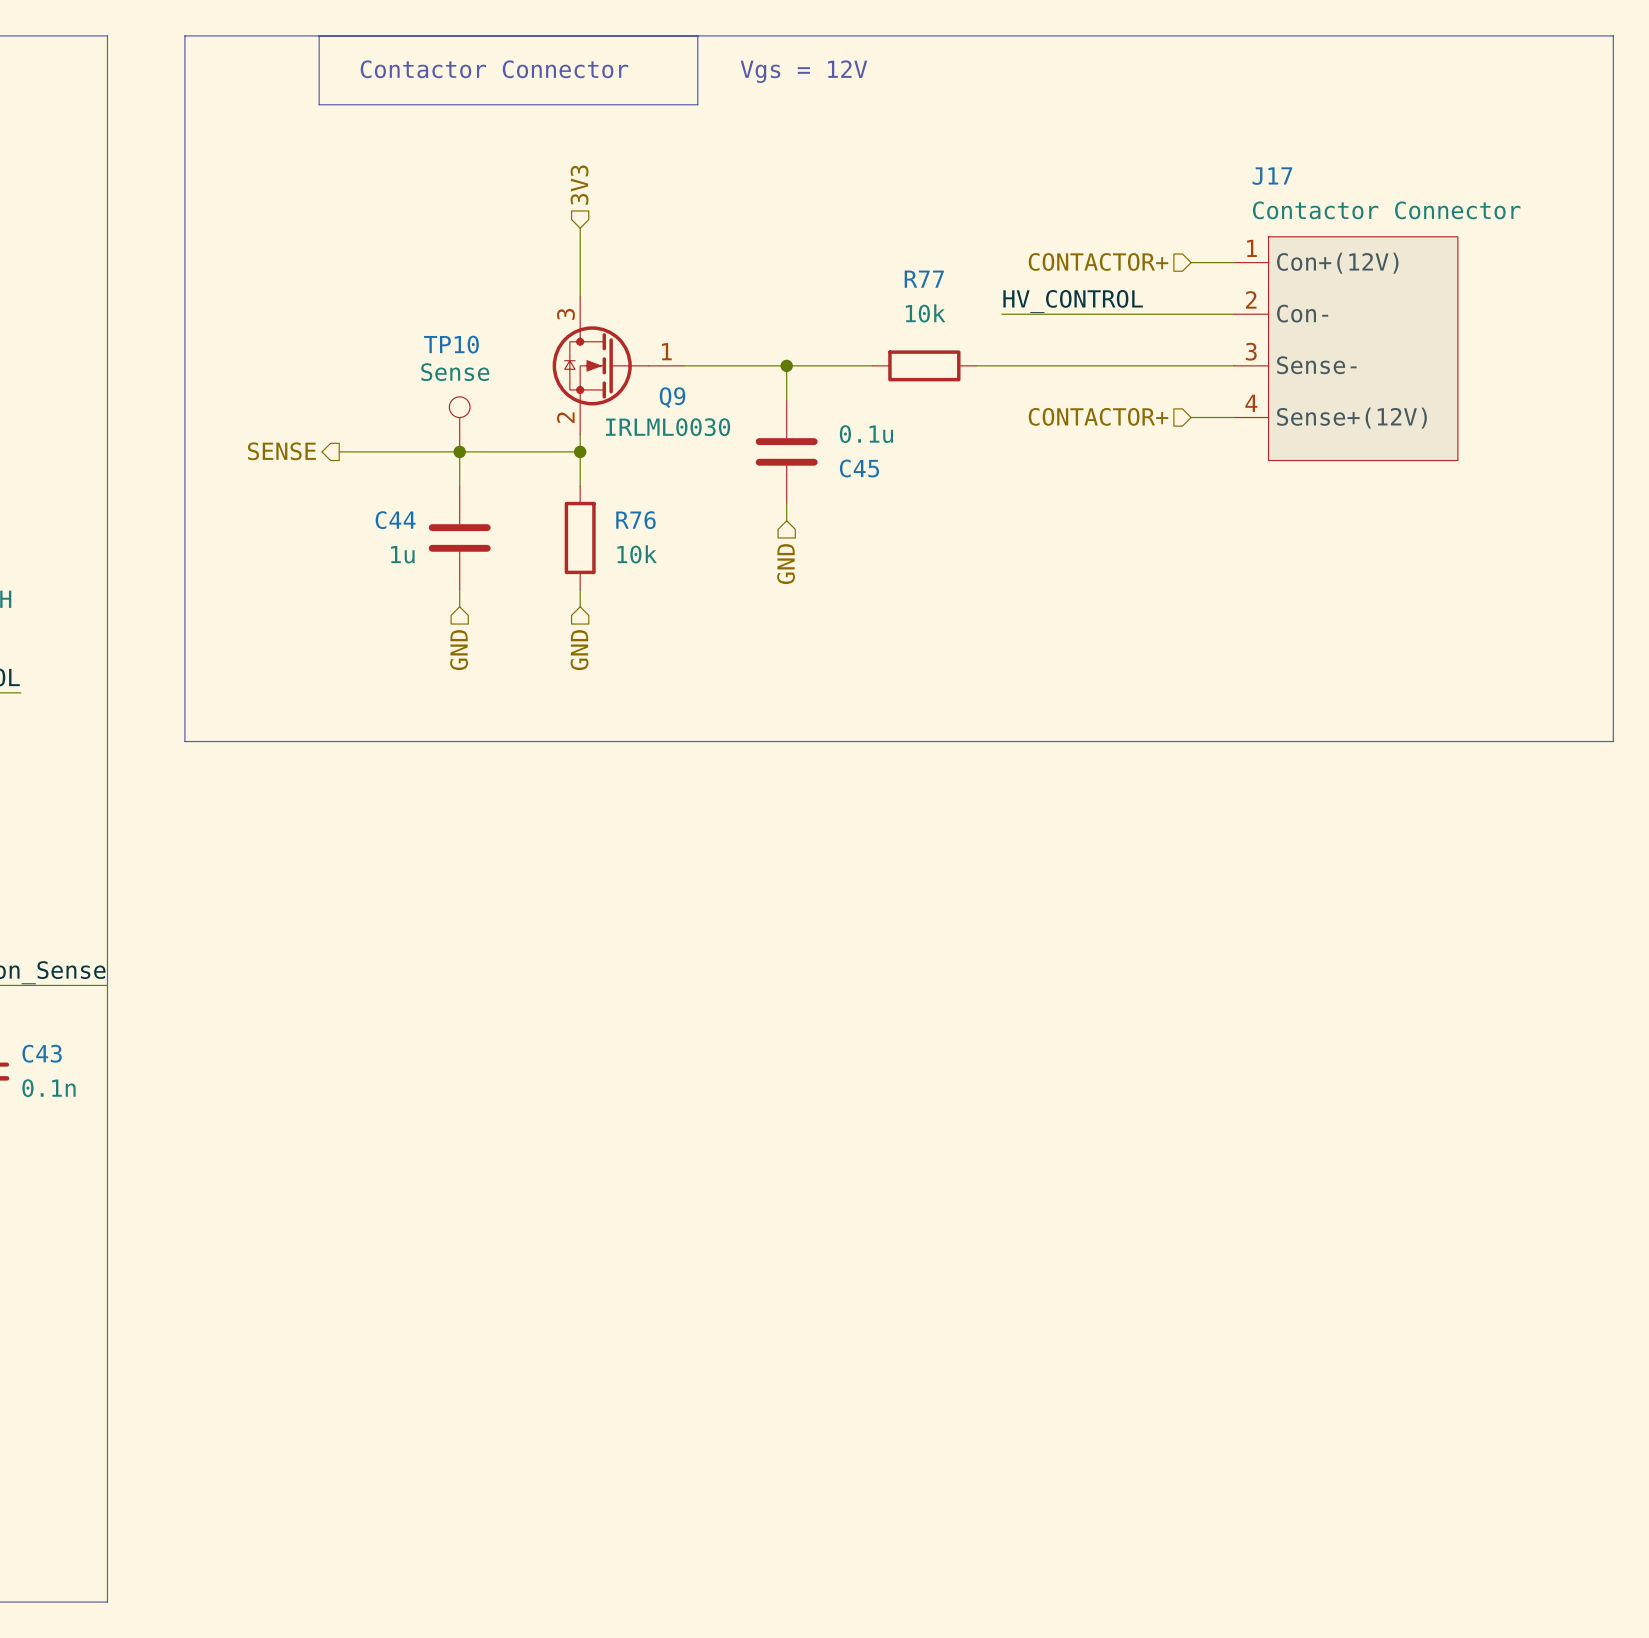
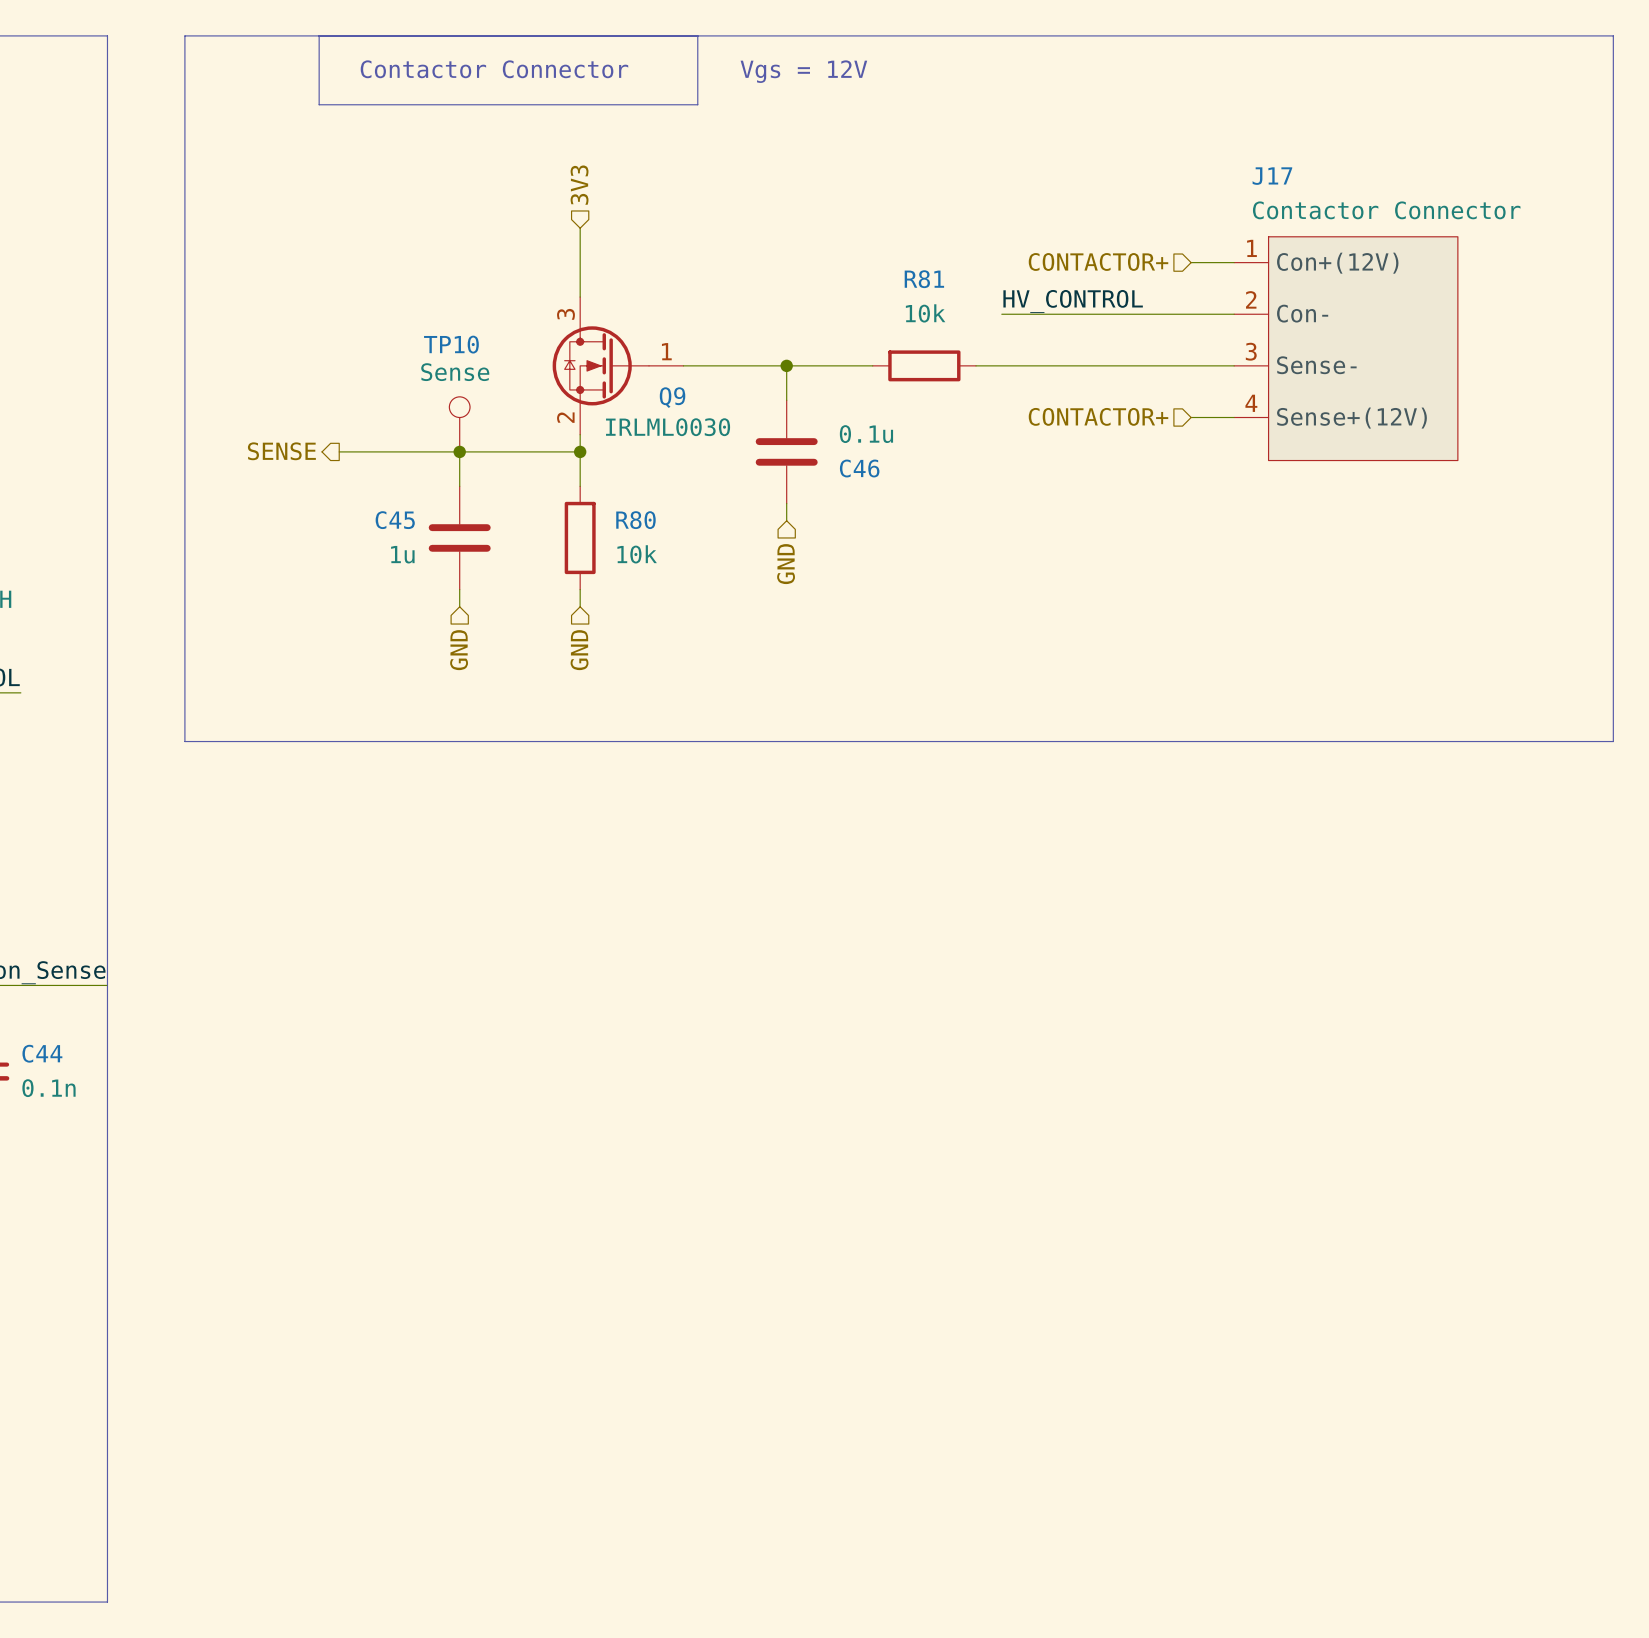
R77 name: R77 (924, 279) -> R81 (924, 279)
C45 name: C45 (859, 468) -> C46 (859, 468)
C44 name: C44 (395, 520) -> C45 (395, 520)
R76 name: R76 (635, 520) -> R80 (635, 520)
C43 name: C43 (42, 1053) -> C44 (42, 1053)

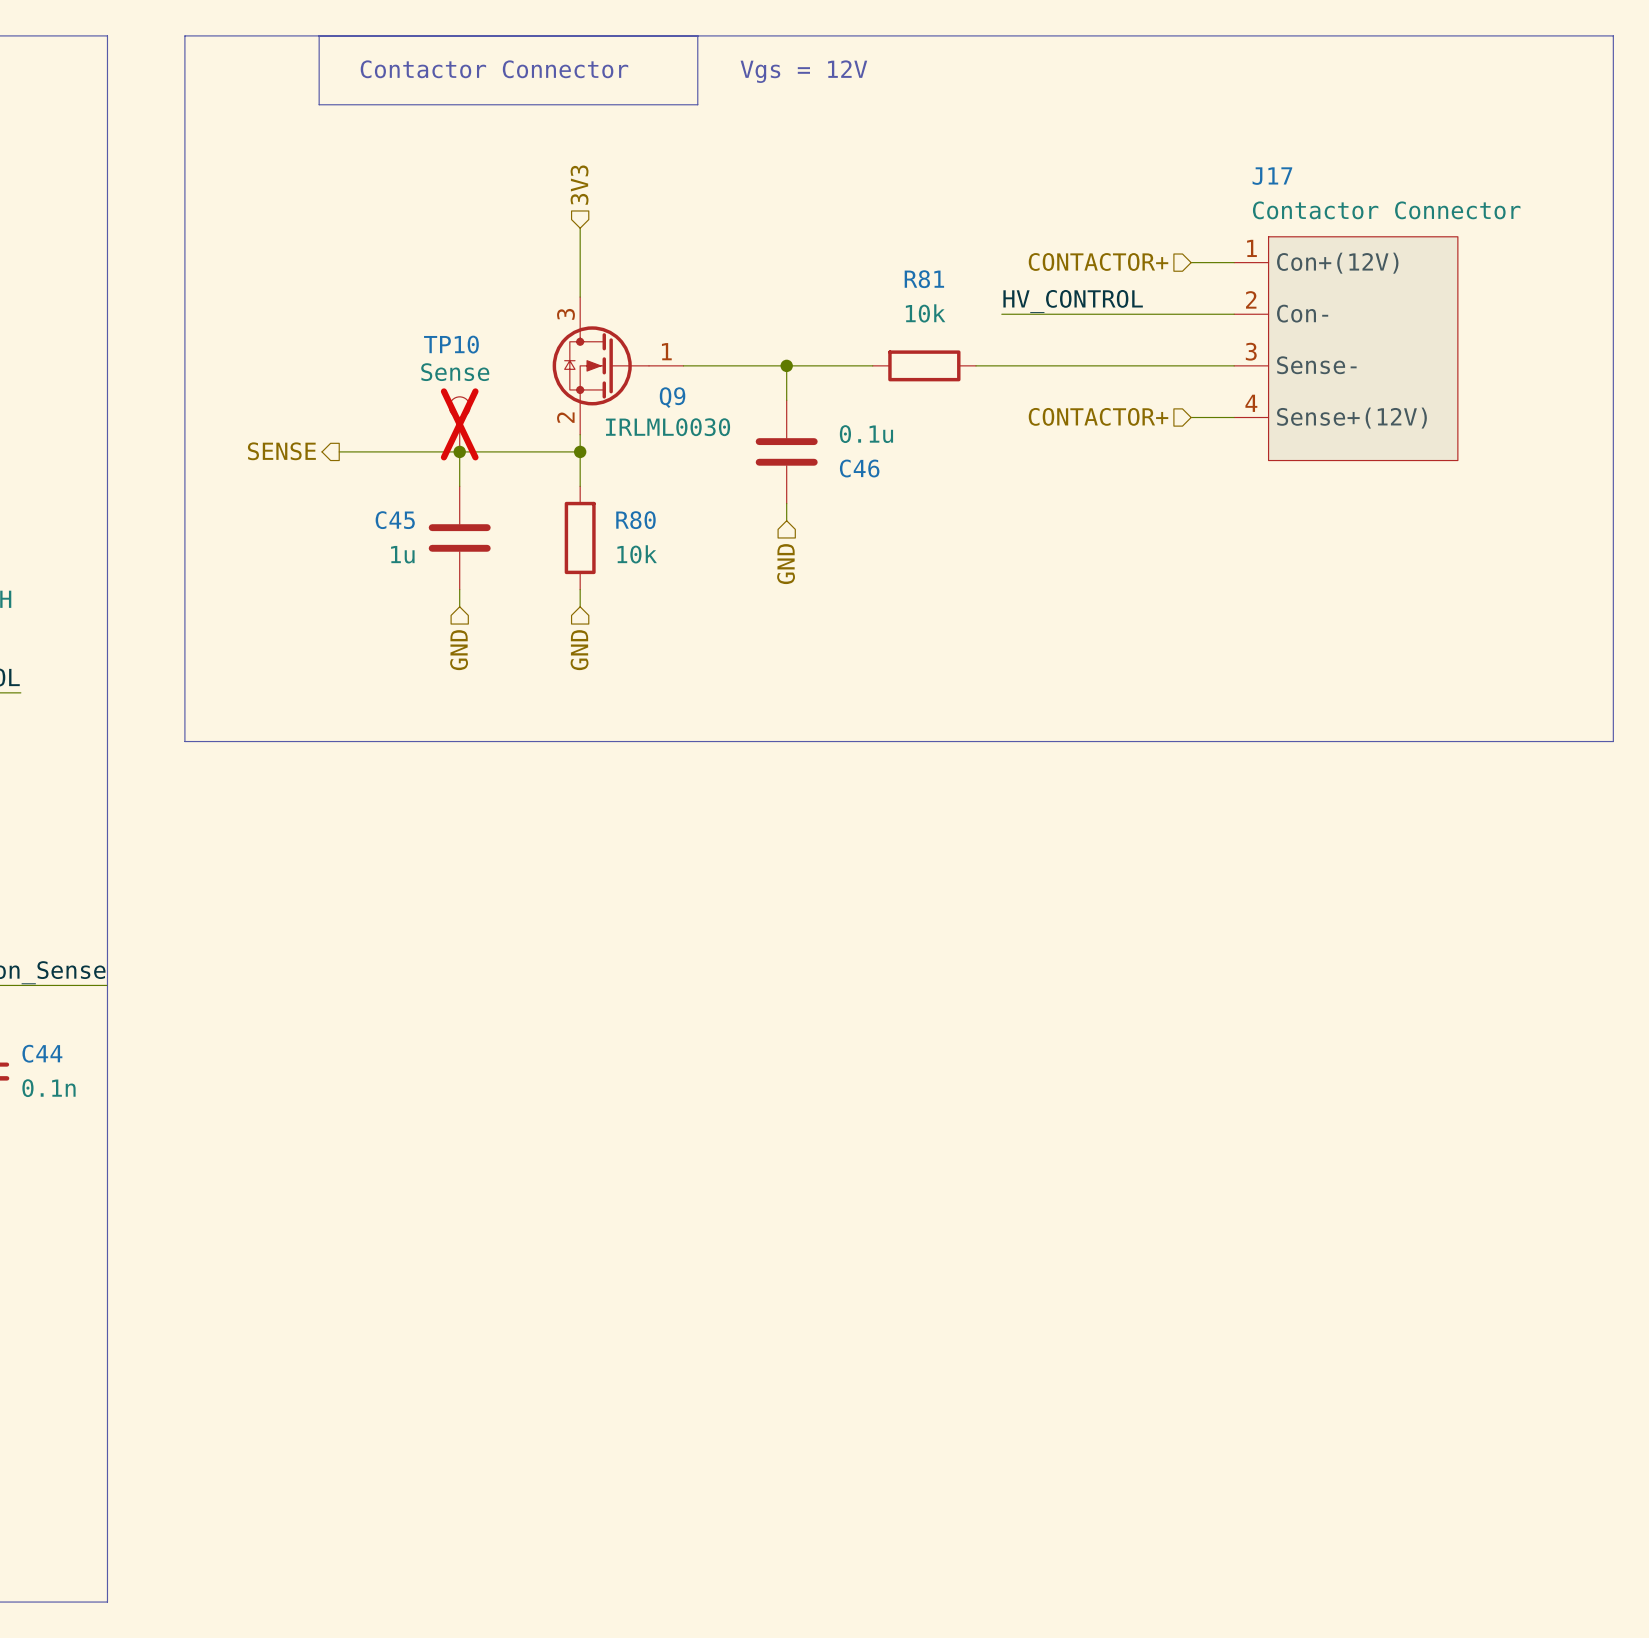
TP10 do-not-place cross: none -> (459, 424)

